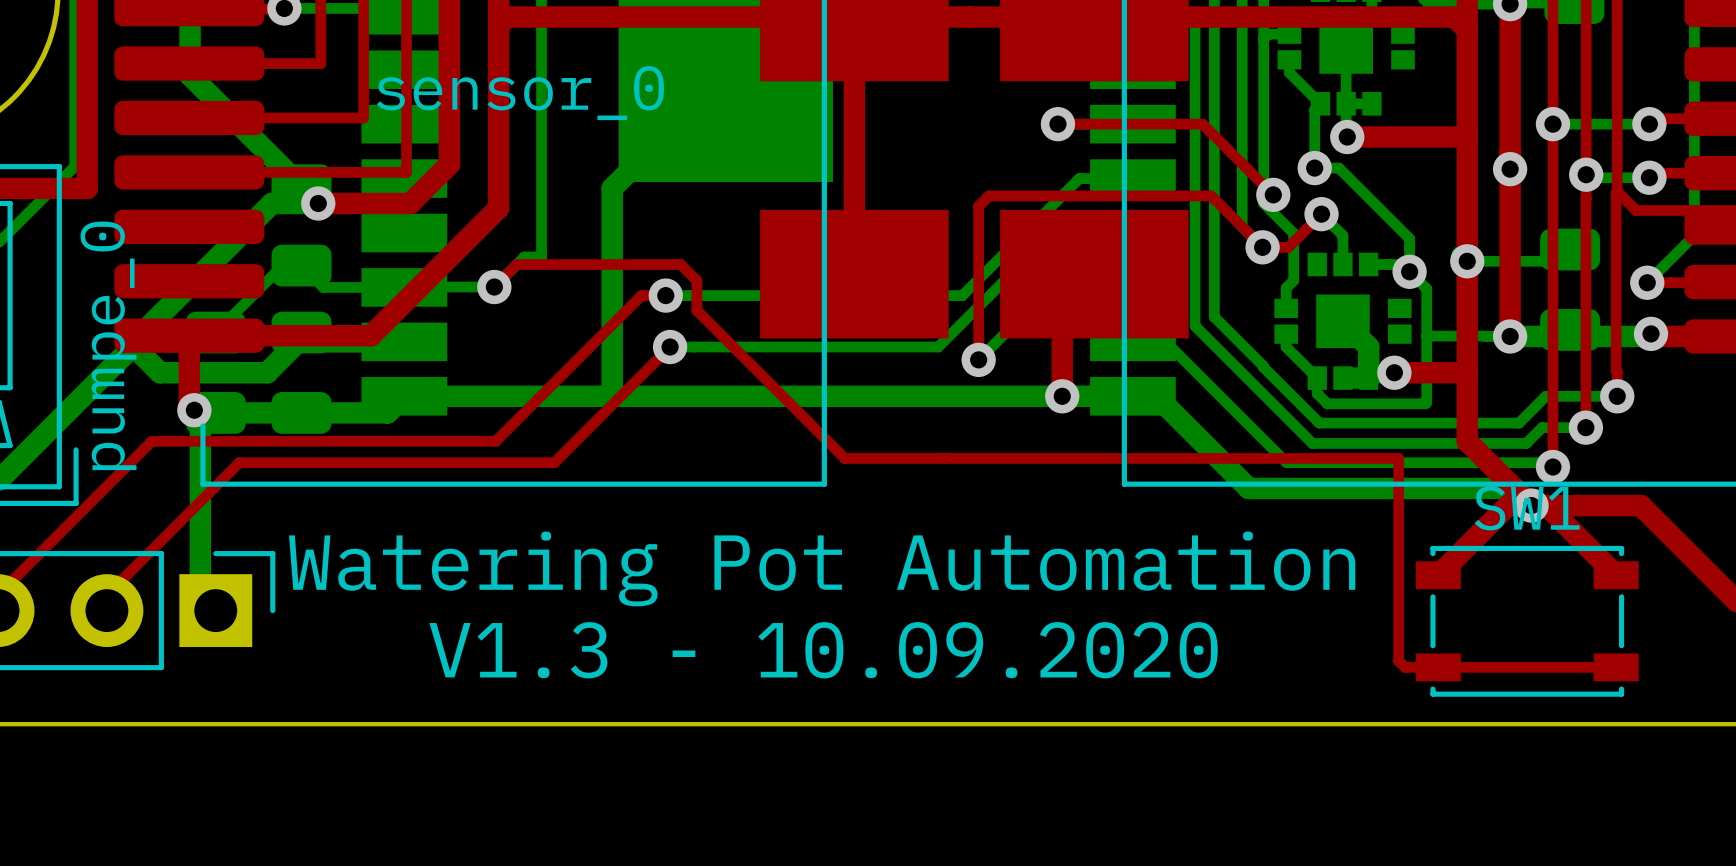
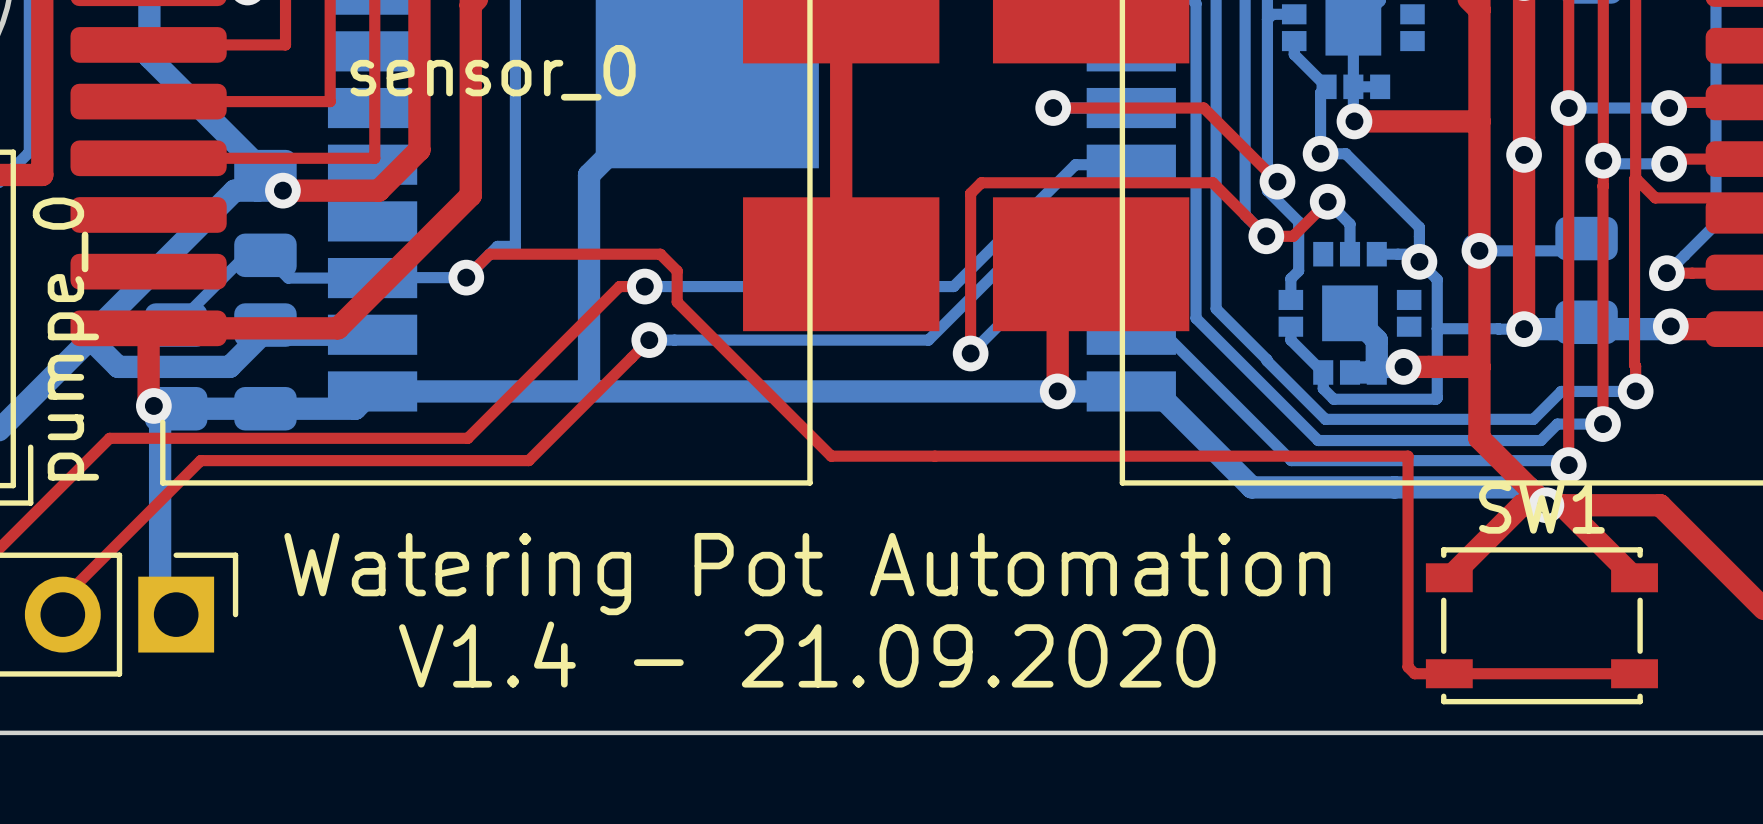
text: V1.3 - 10.09.2020 (823, 650) -> V1.4 - 21.09.2020 (807, 654)

